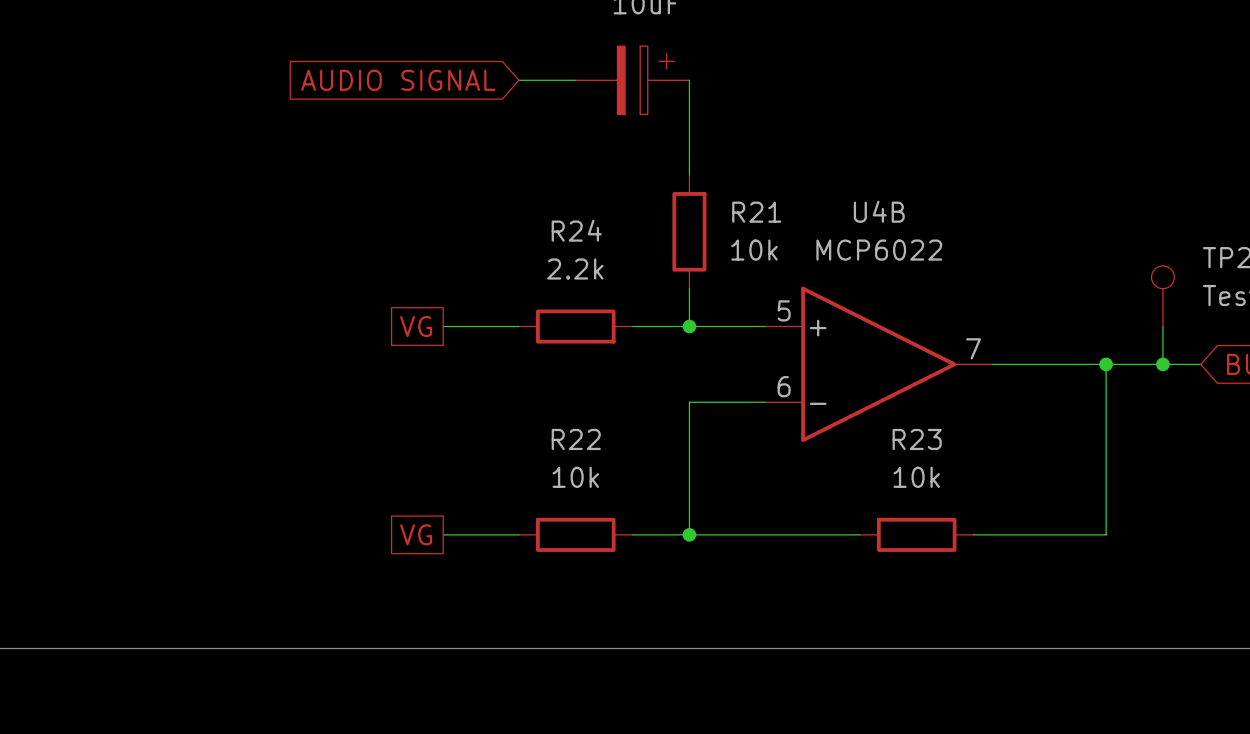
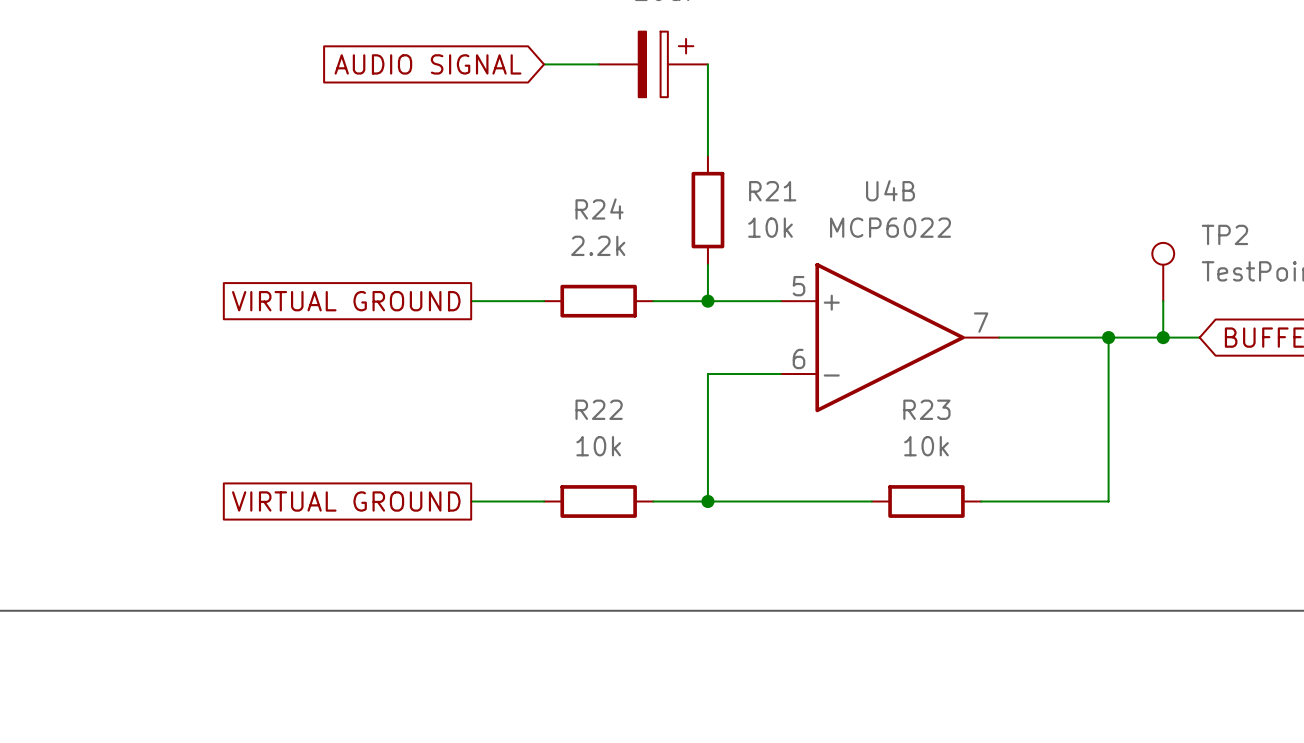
global label: VG (416, 326) -> VIRTUAL GROUND (346, 301)
global label: VG (416, 534) -> VIRTUAL GROUND (346, 501)

